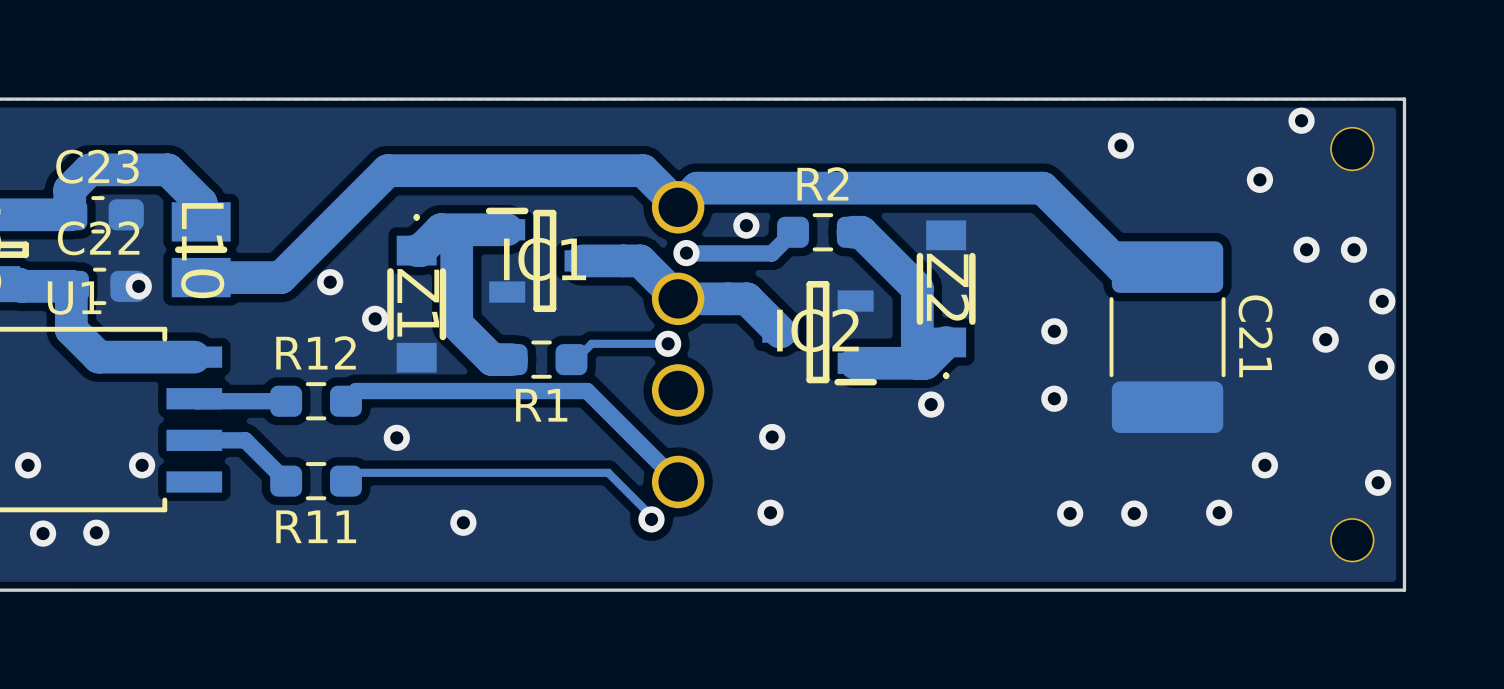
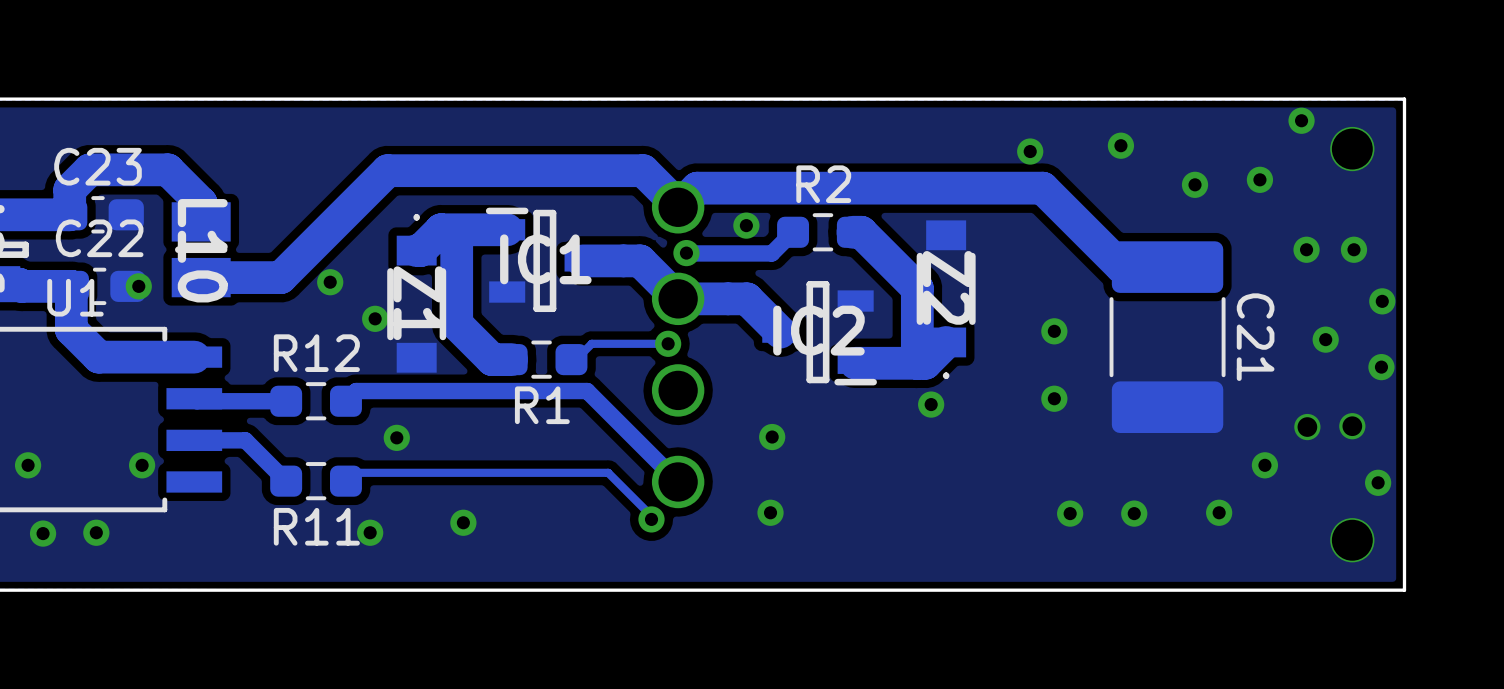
via: none -> (1030, 151)
via: none -> (1195, 184)
via: none -> (1352, 426)
via: none -> (1307, 427)
via: none -> (370, 532)

